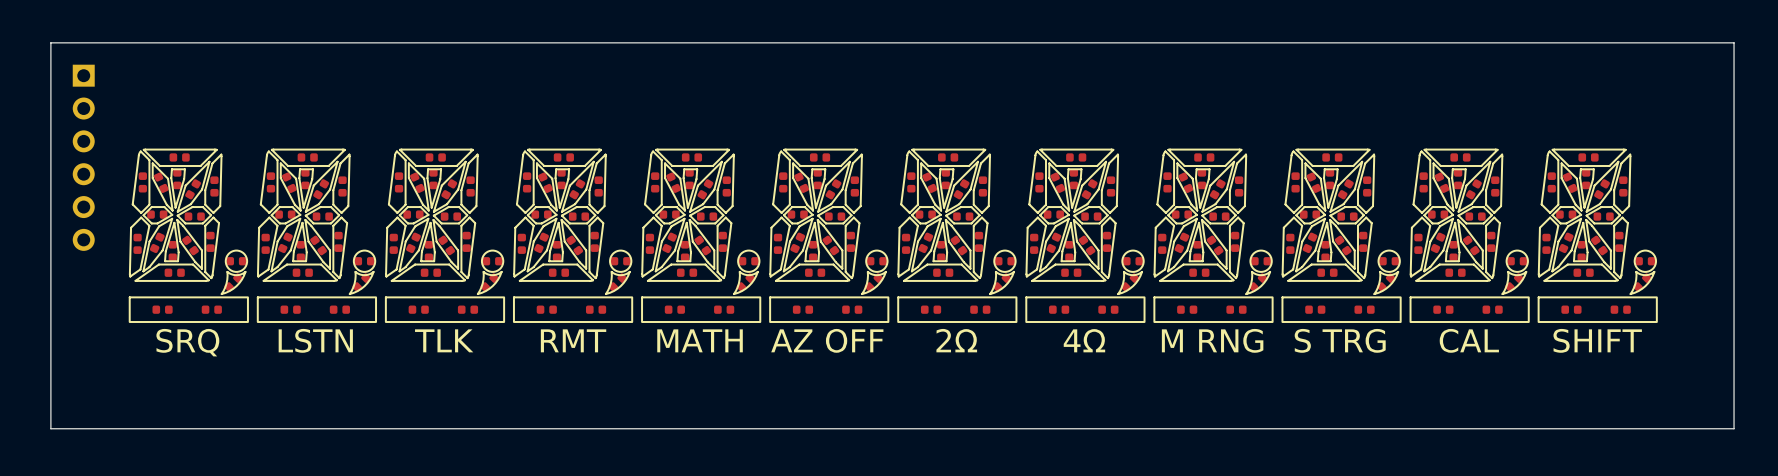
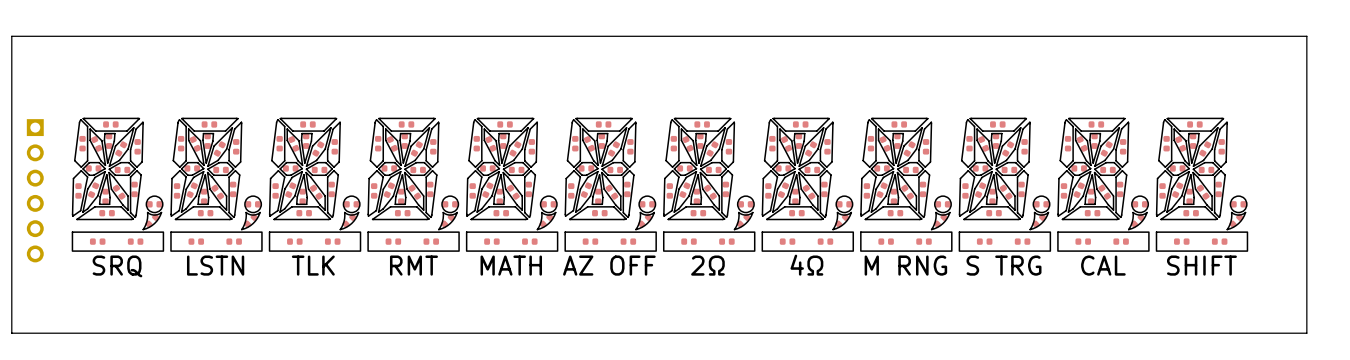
part position: (83, 157) -> (35, 190)

